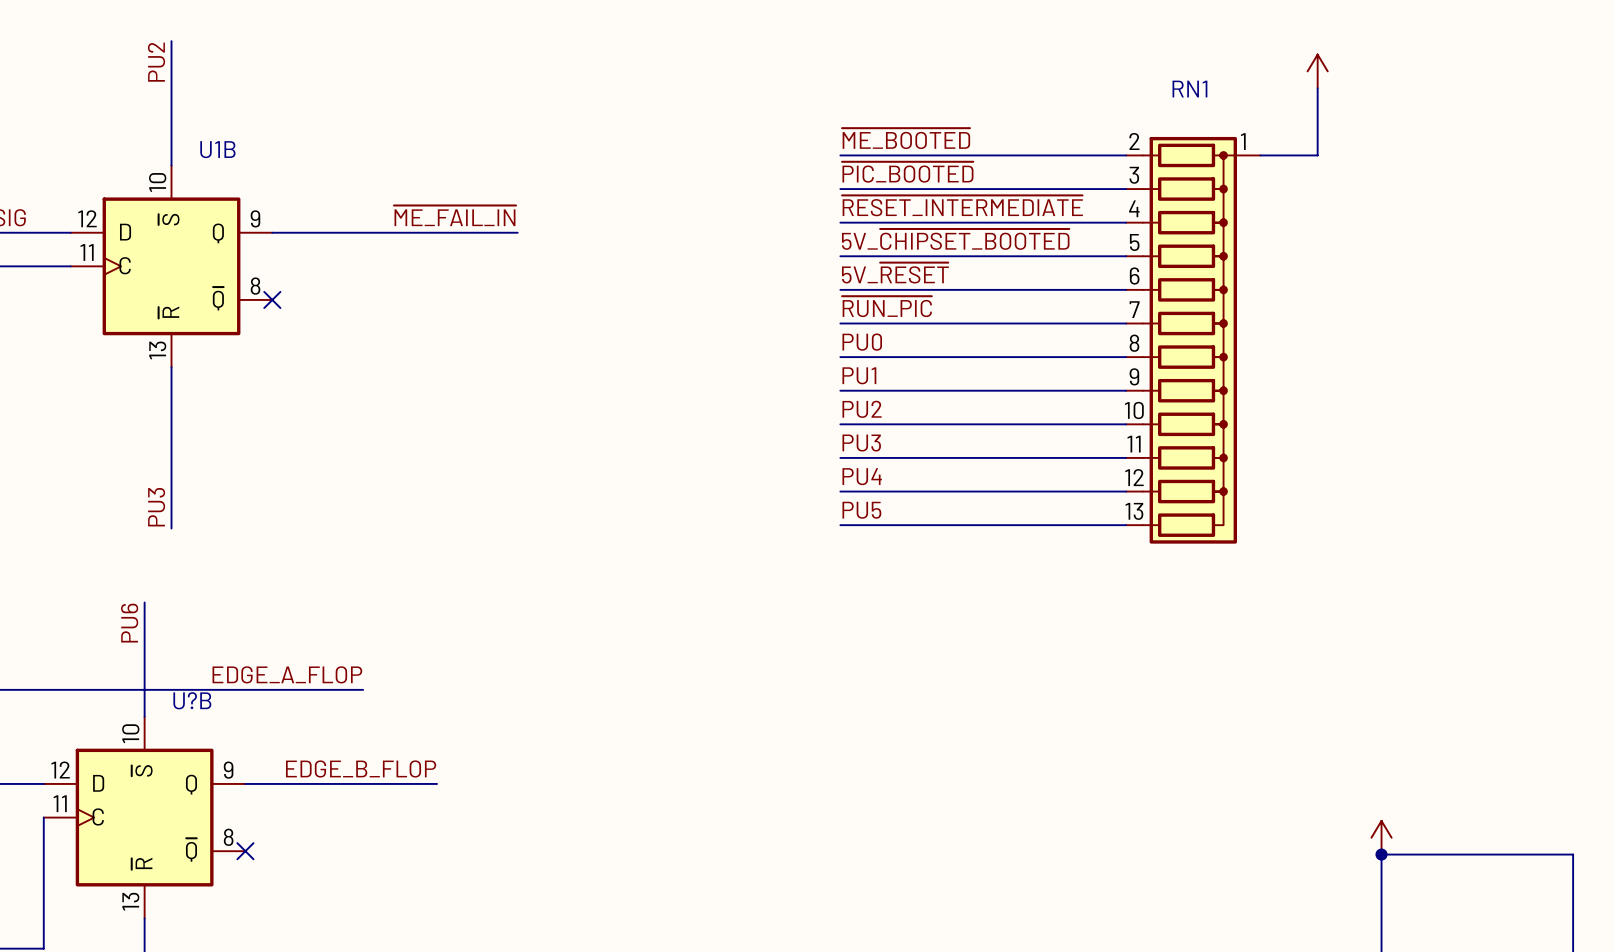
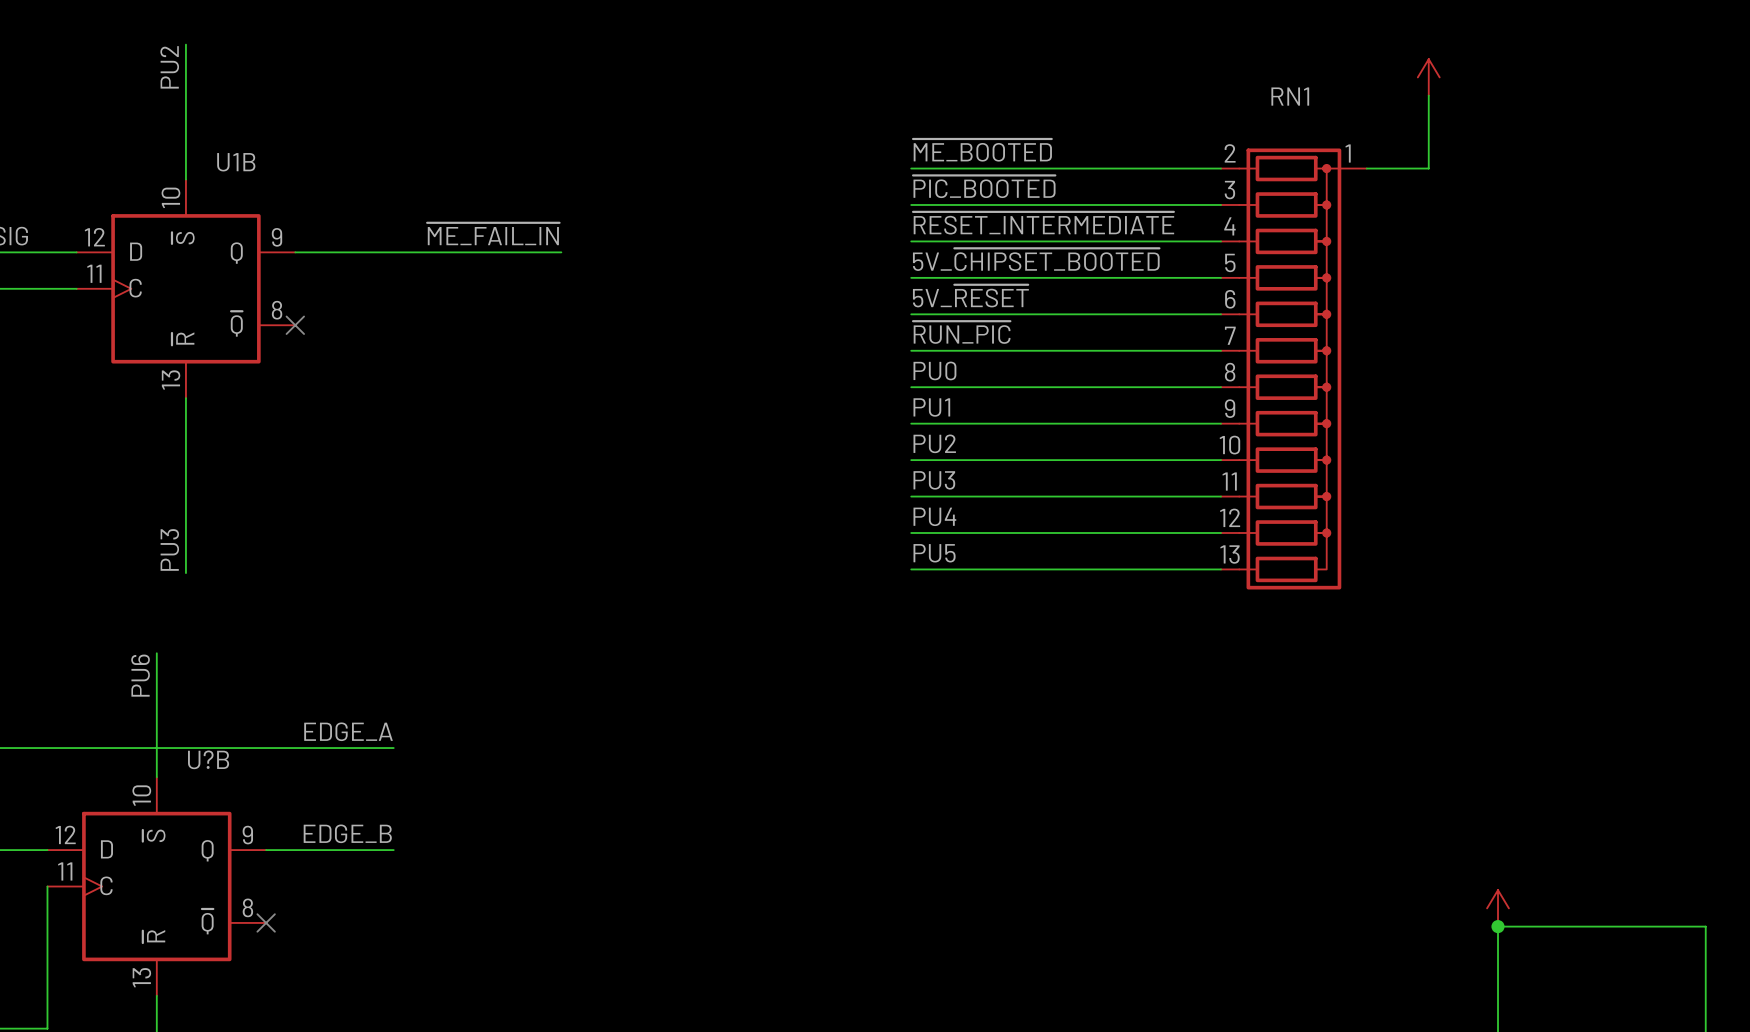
label: EDGE_A_FLOP (287, 674) -> EDGE_A (348, 731)
label: EDGE_B_FLOP (361, 768) -> EDGE_B (347, 833)
wire: (363, 783) (437, 783) -> none

